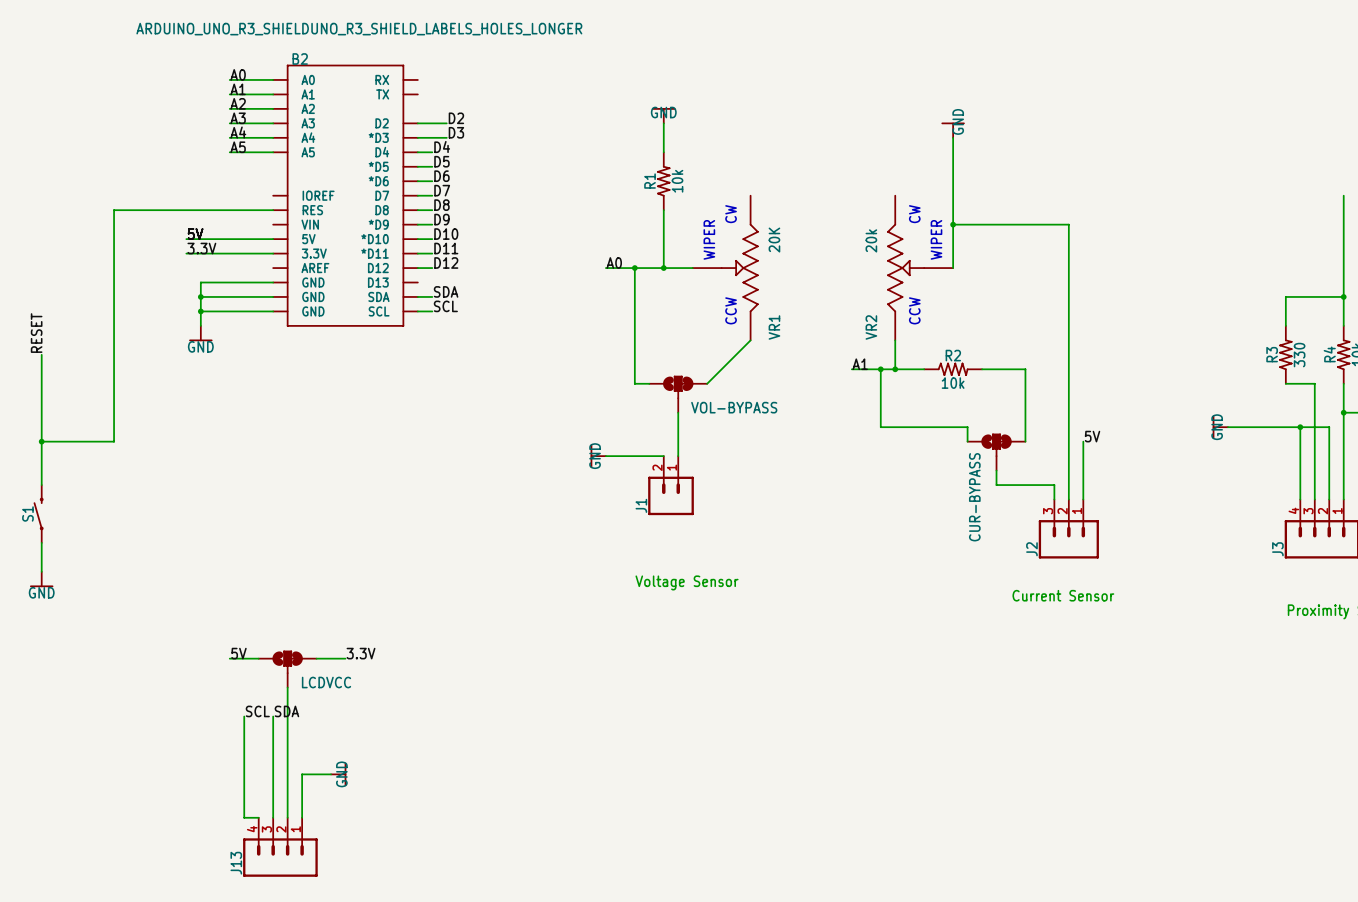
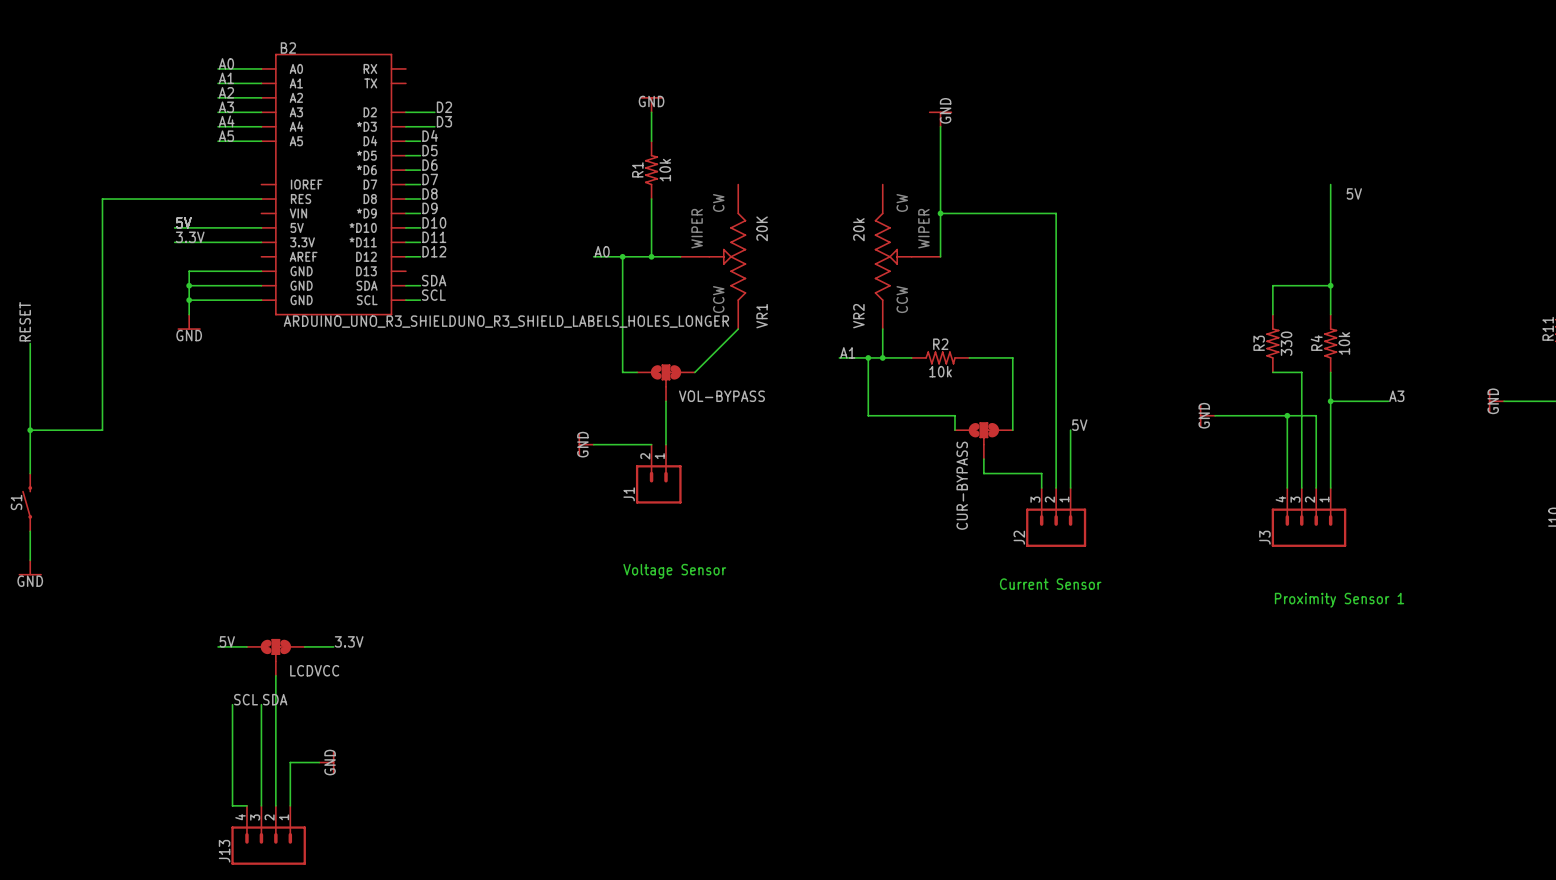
B2 value position: ARDUINO_UNO_R3_SHIELDUNO_R3_SHIELD_LABELS_HOLES_LONGER (359, 29) -> ARDUINO_UNO_R3_SHIELDUNO_R3_SHIELD_LABELS_HOLES_LONGER (506, 321)

